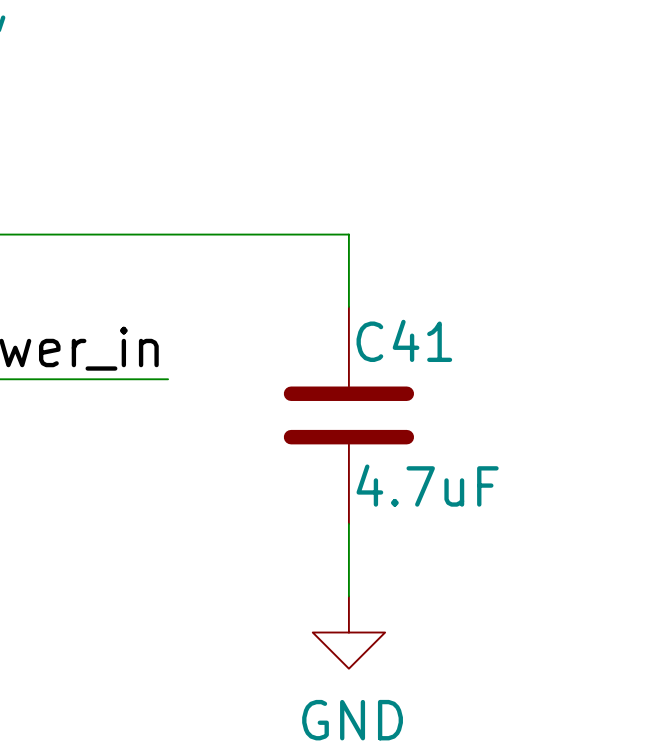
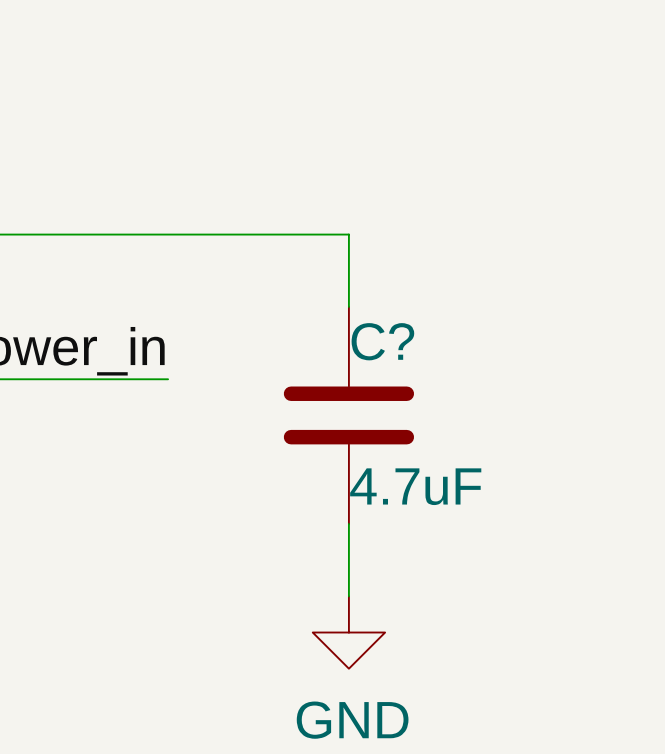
C41 name: C41 (404, 340) -> C? (382, 341)

